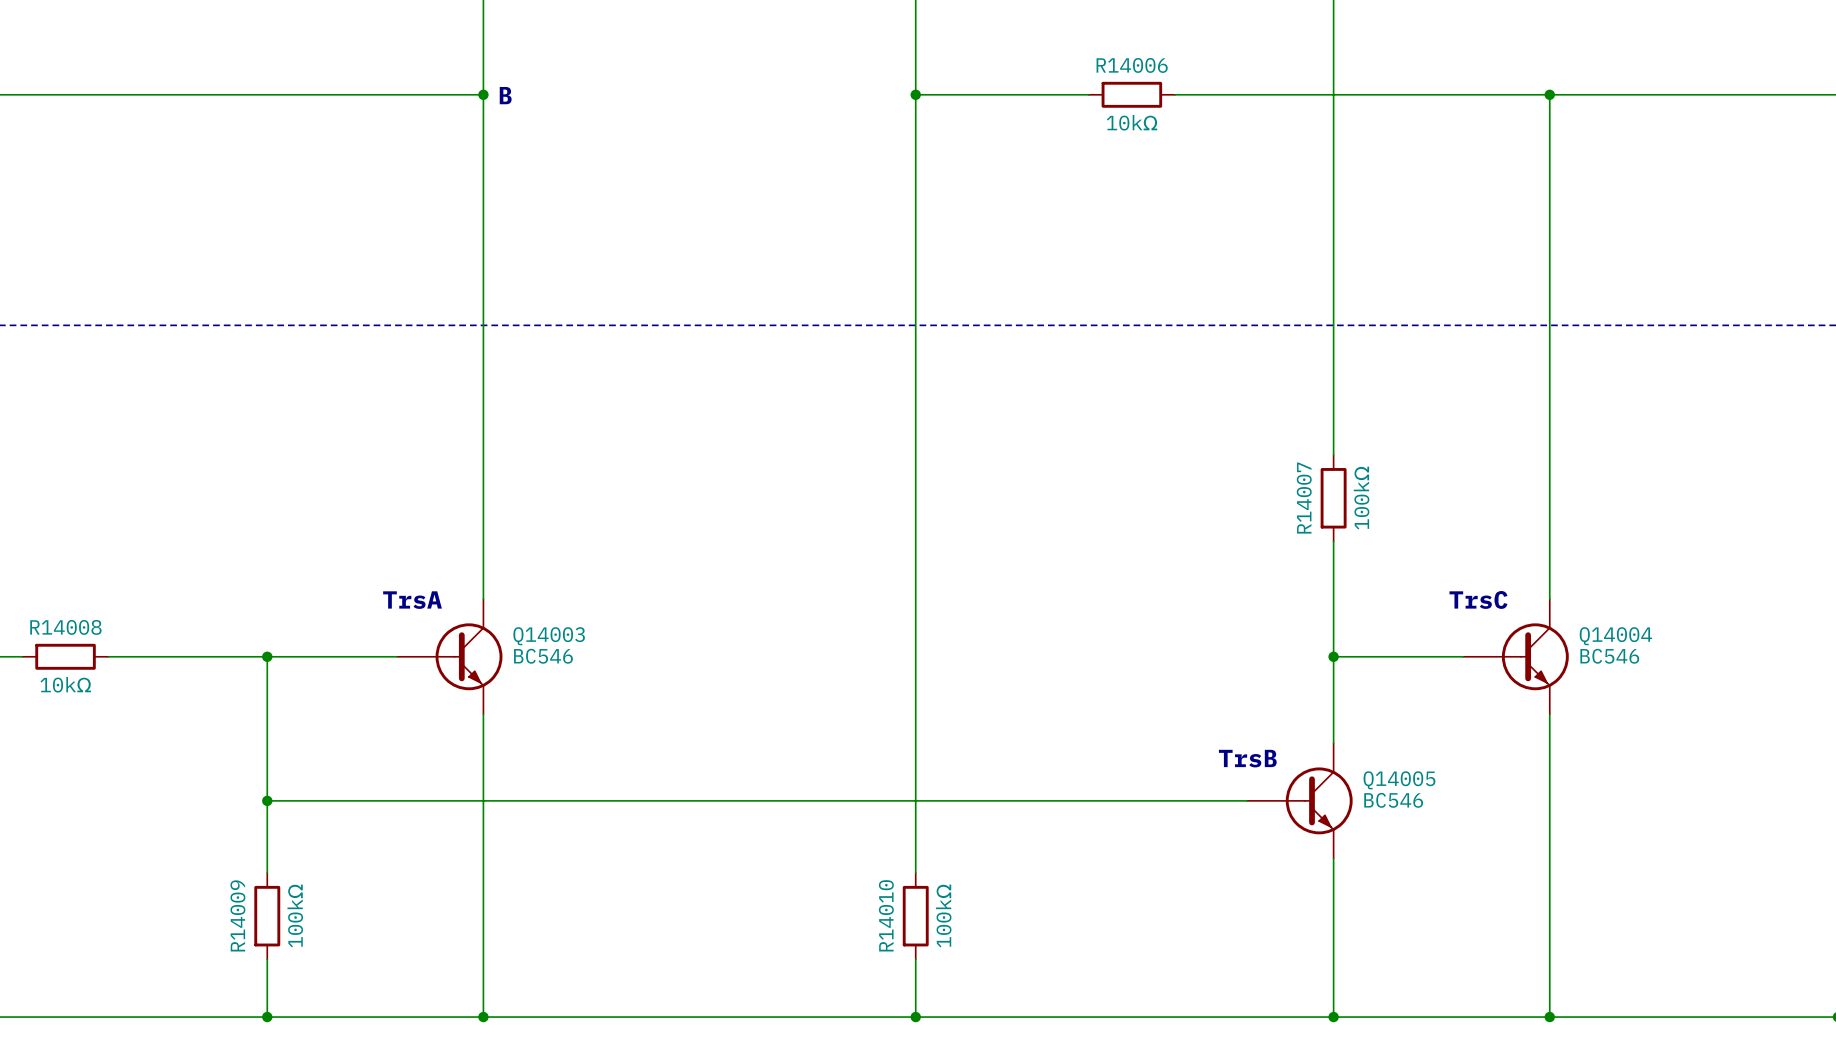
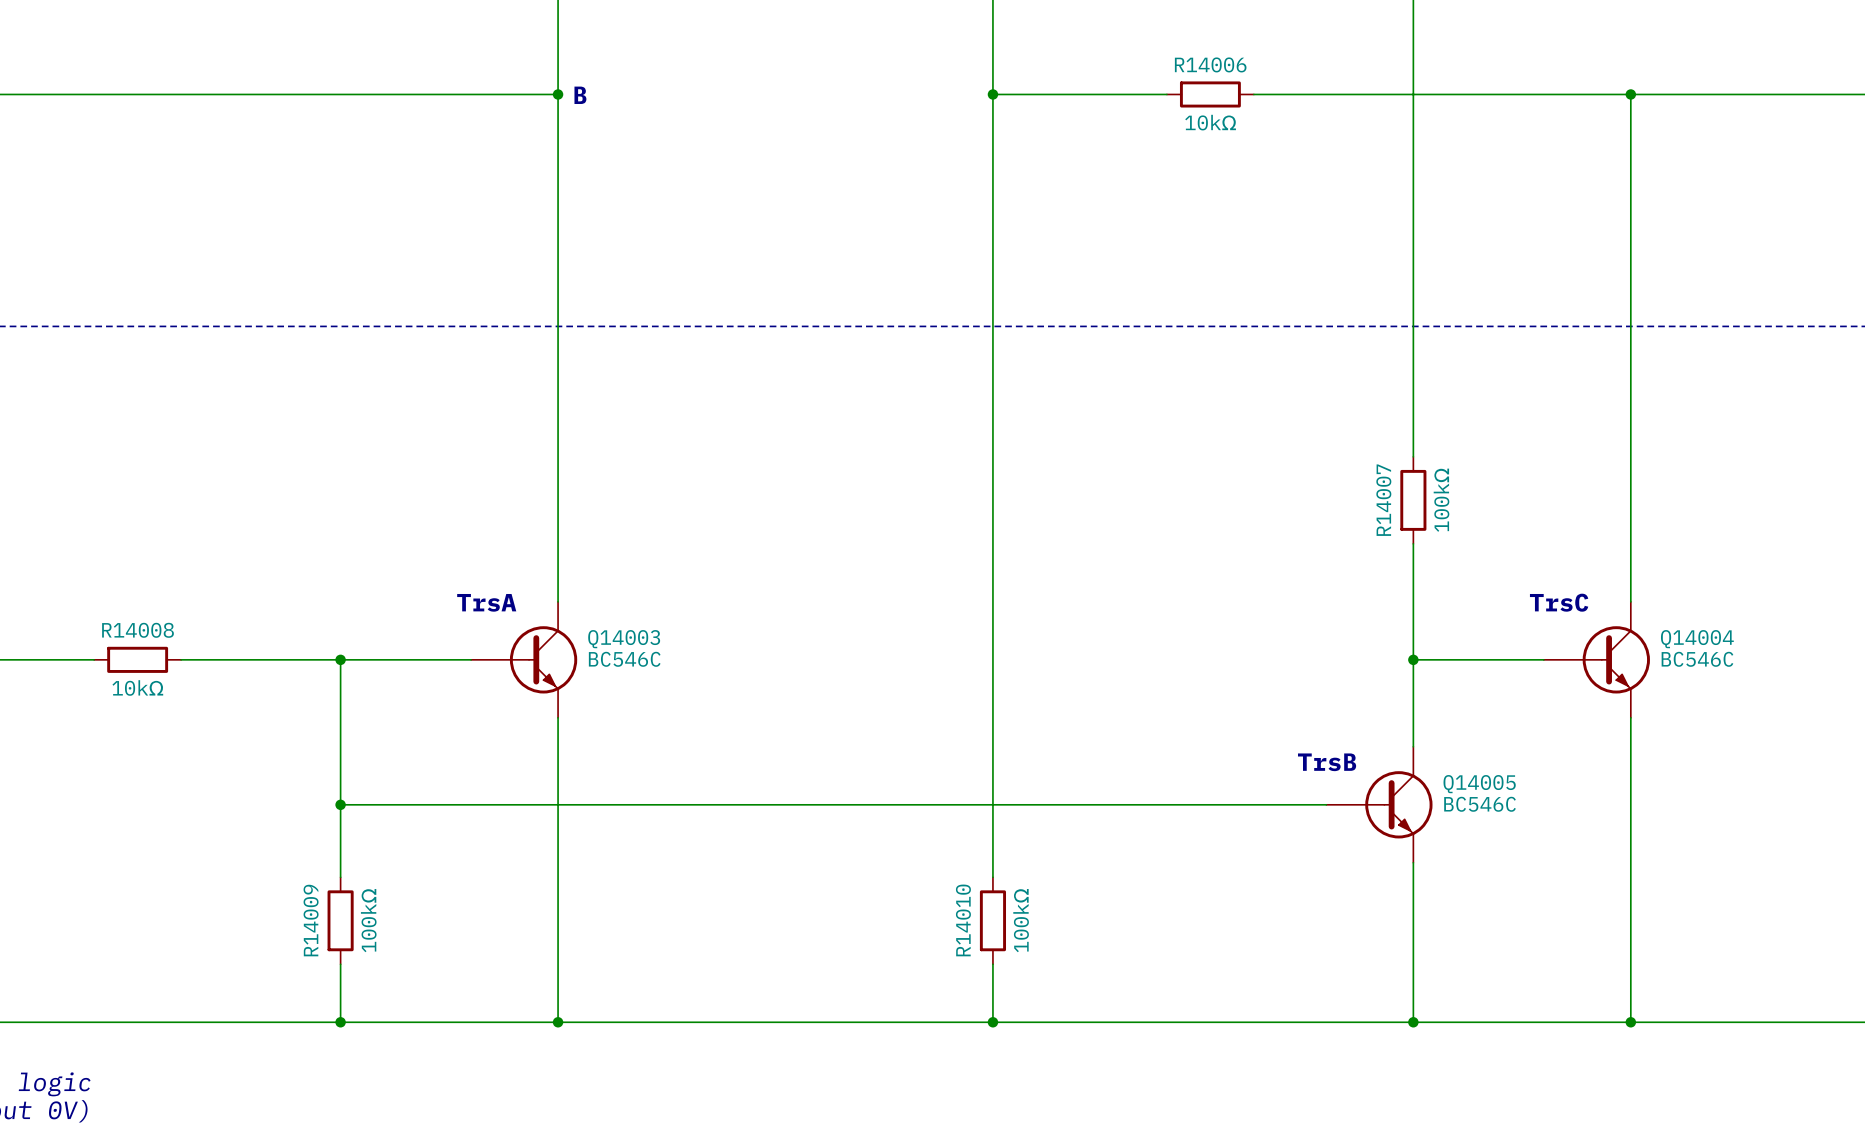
Q14003 value: BC546 (543, 656) -> BC546C (624, 659)
Q14004 value: BC546 (1609, 656) -> BC546C (1697, 659)
Q14005 value: BC546 (1393, 800) -> BC546C (1480, 804)

